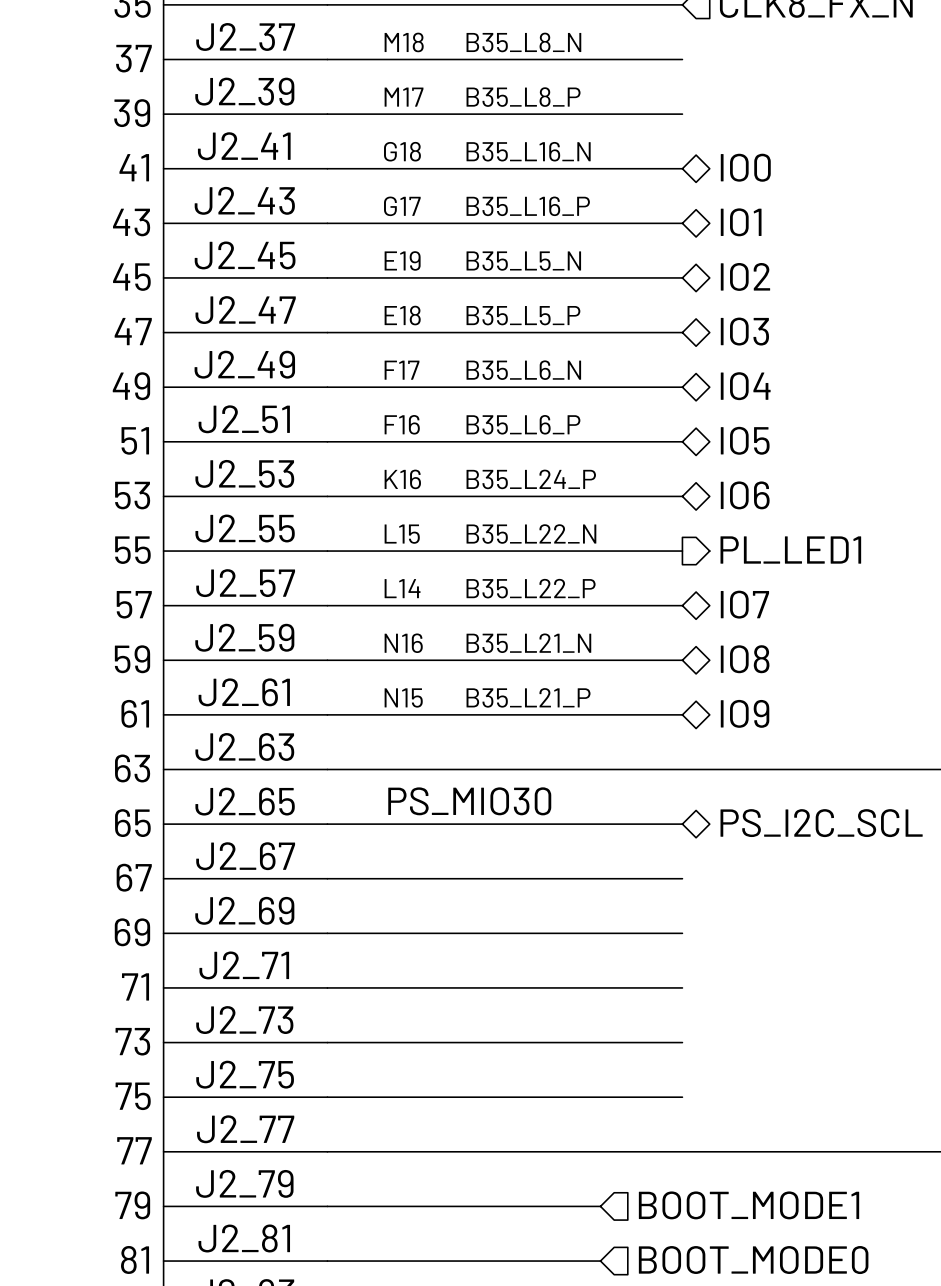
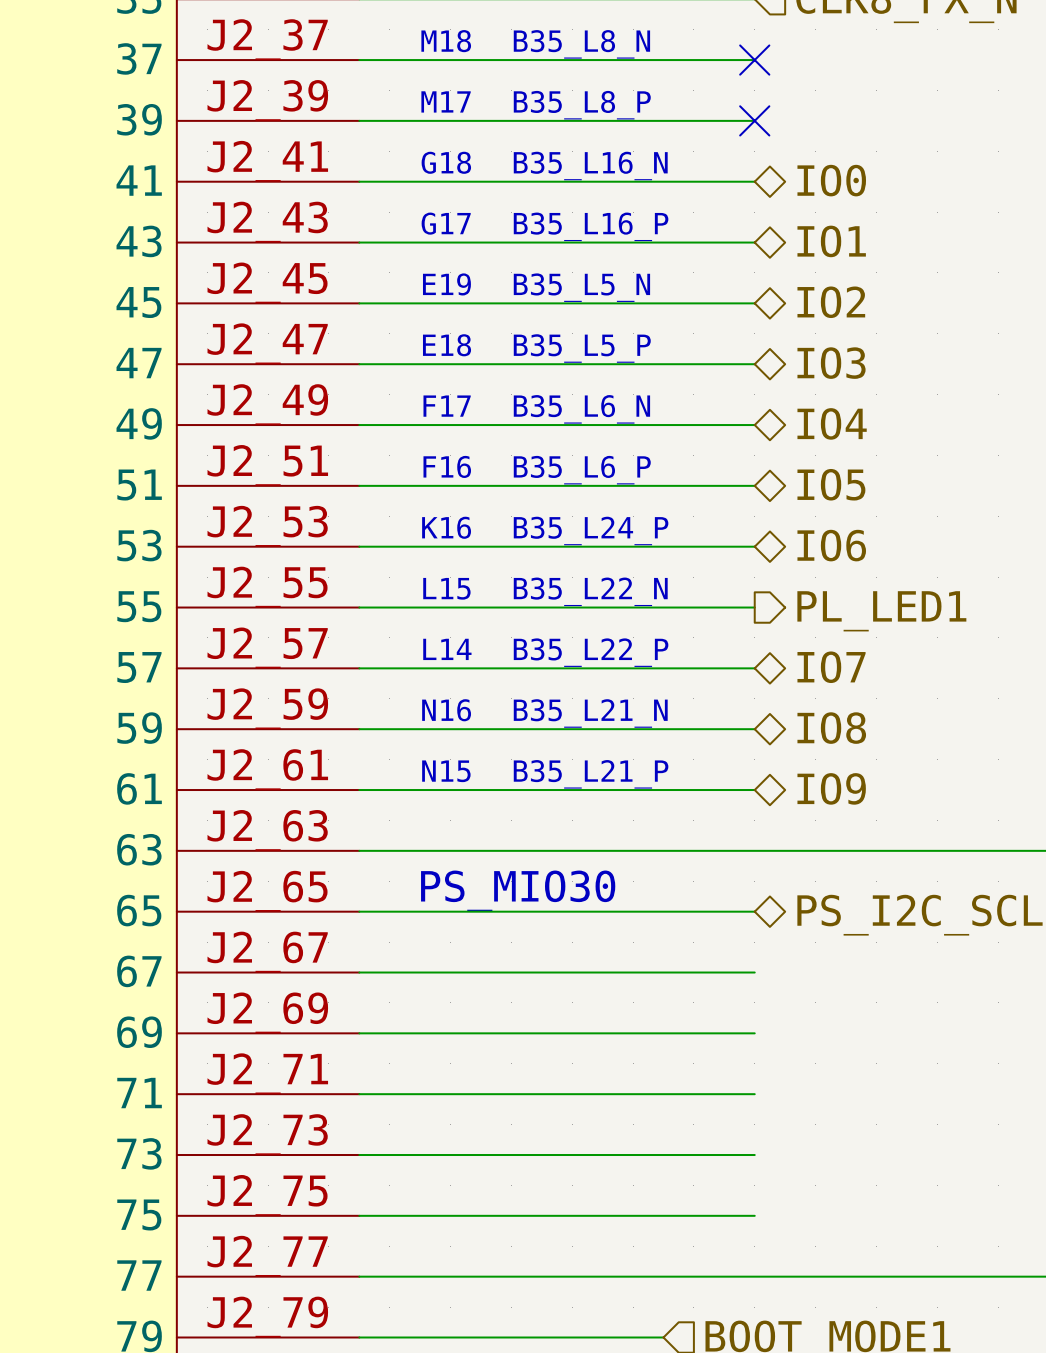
no-connect mark: none -> (754, 60)
no-connect mark: none -> (754, 120)

